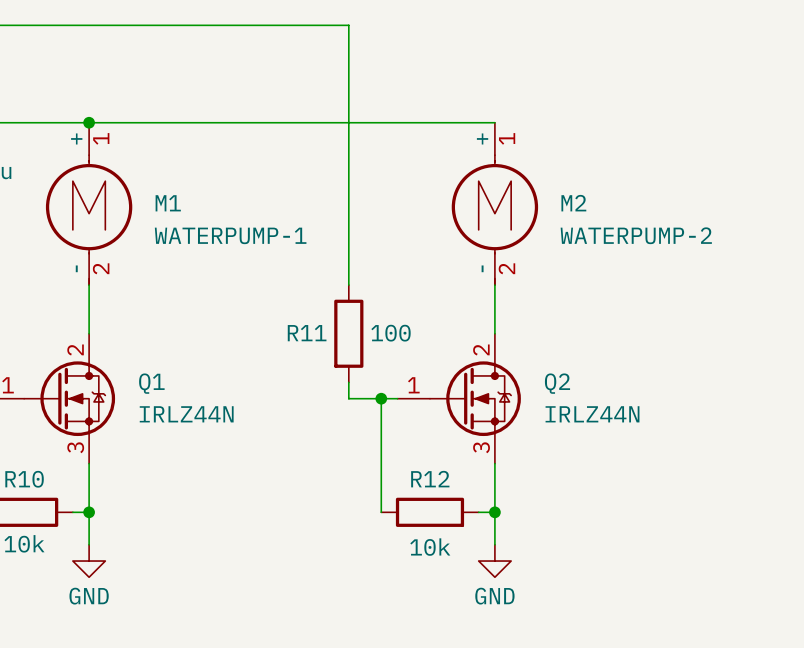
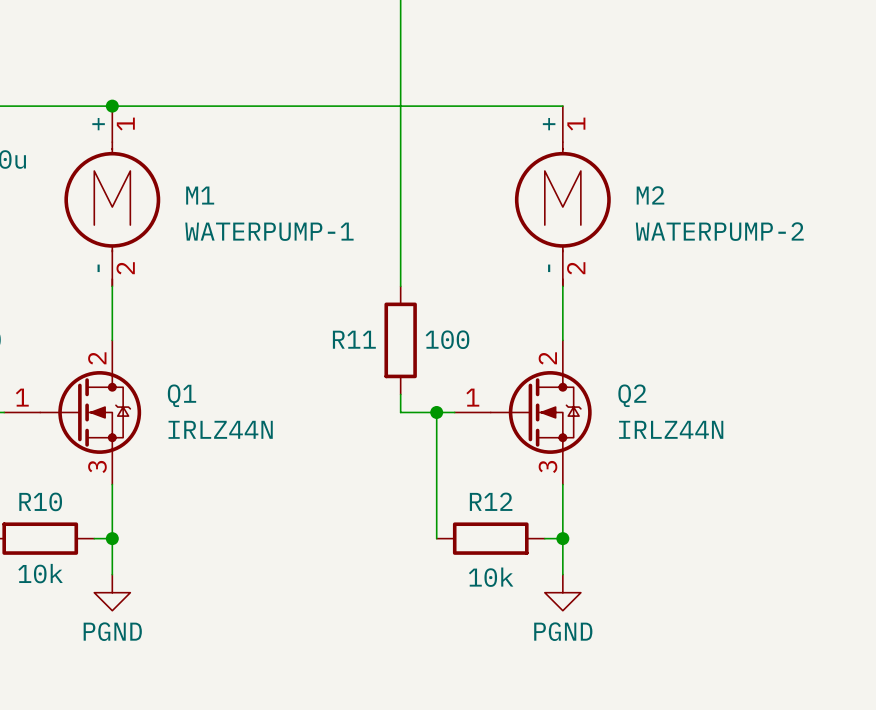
power symbol: GND (89, 561) -> PGND (112, 592)
power symbol: GND (494, 561) -> PGND (562, 592)

